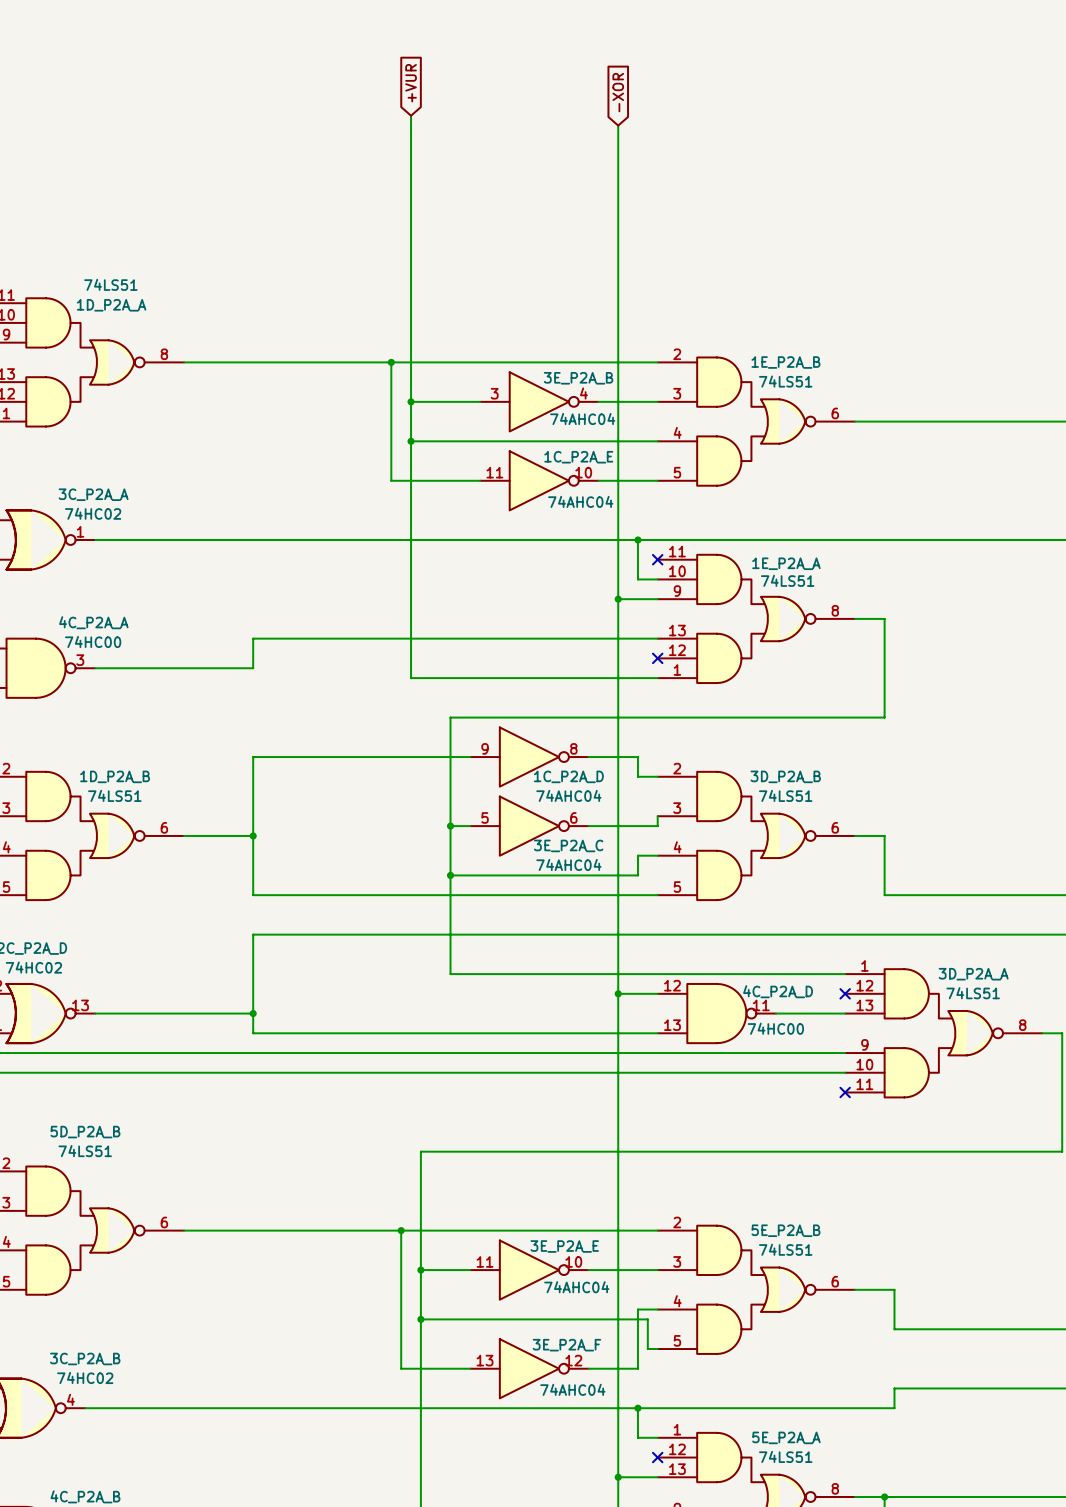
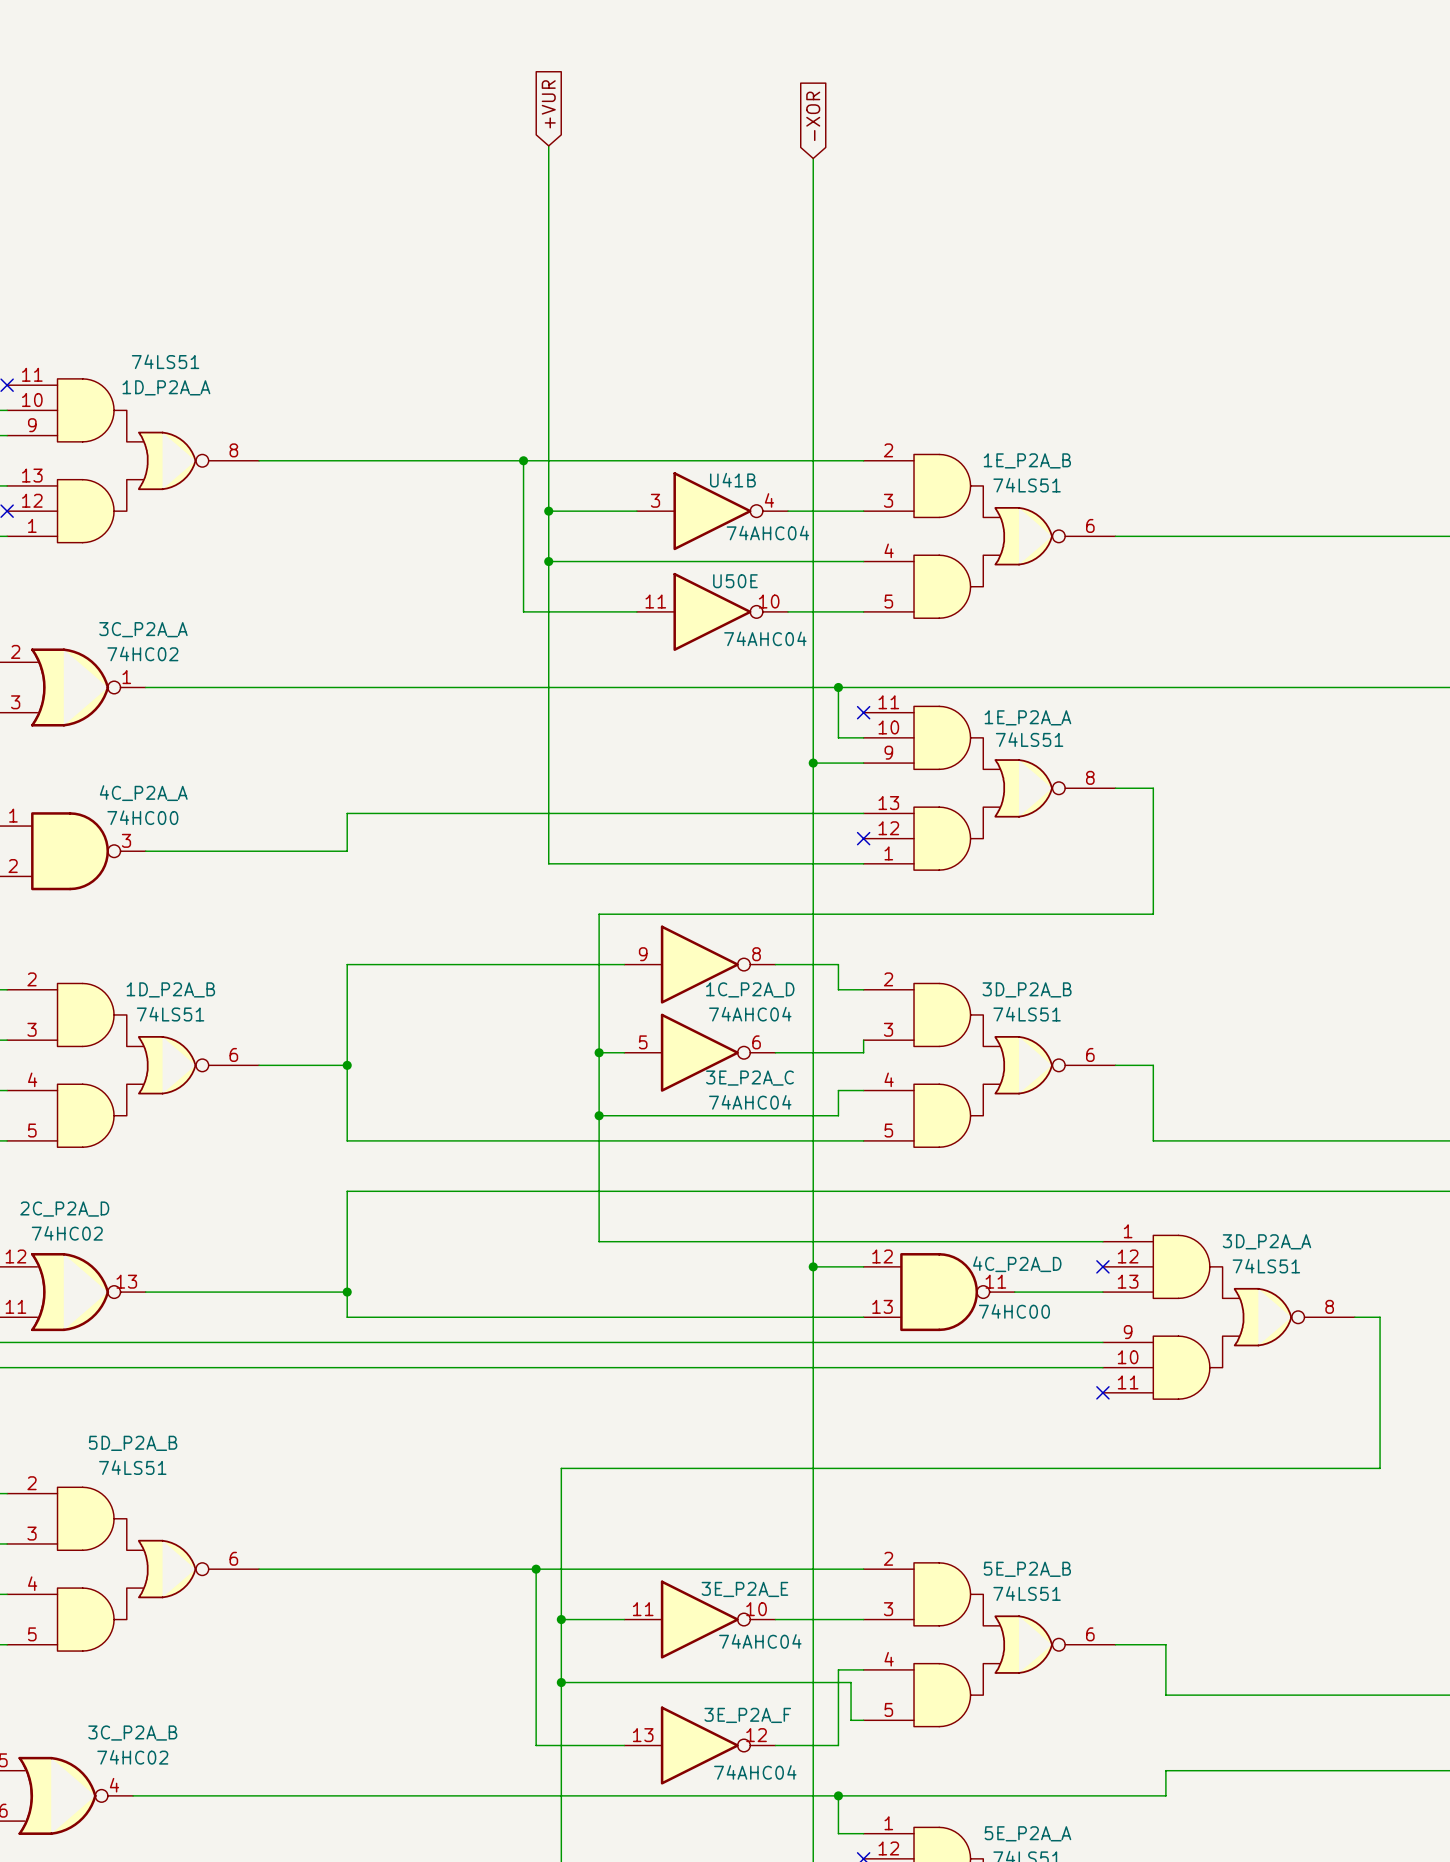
3E_P2A_B name: 3E_P2A_B (578, 378) -> U41B (732, 480)
1C_P2A_E name: 1C_P2A_E (578, 457) -> U50E (735, 581)

